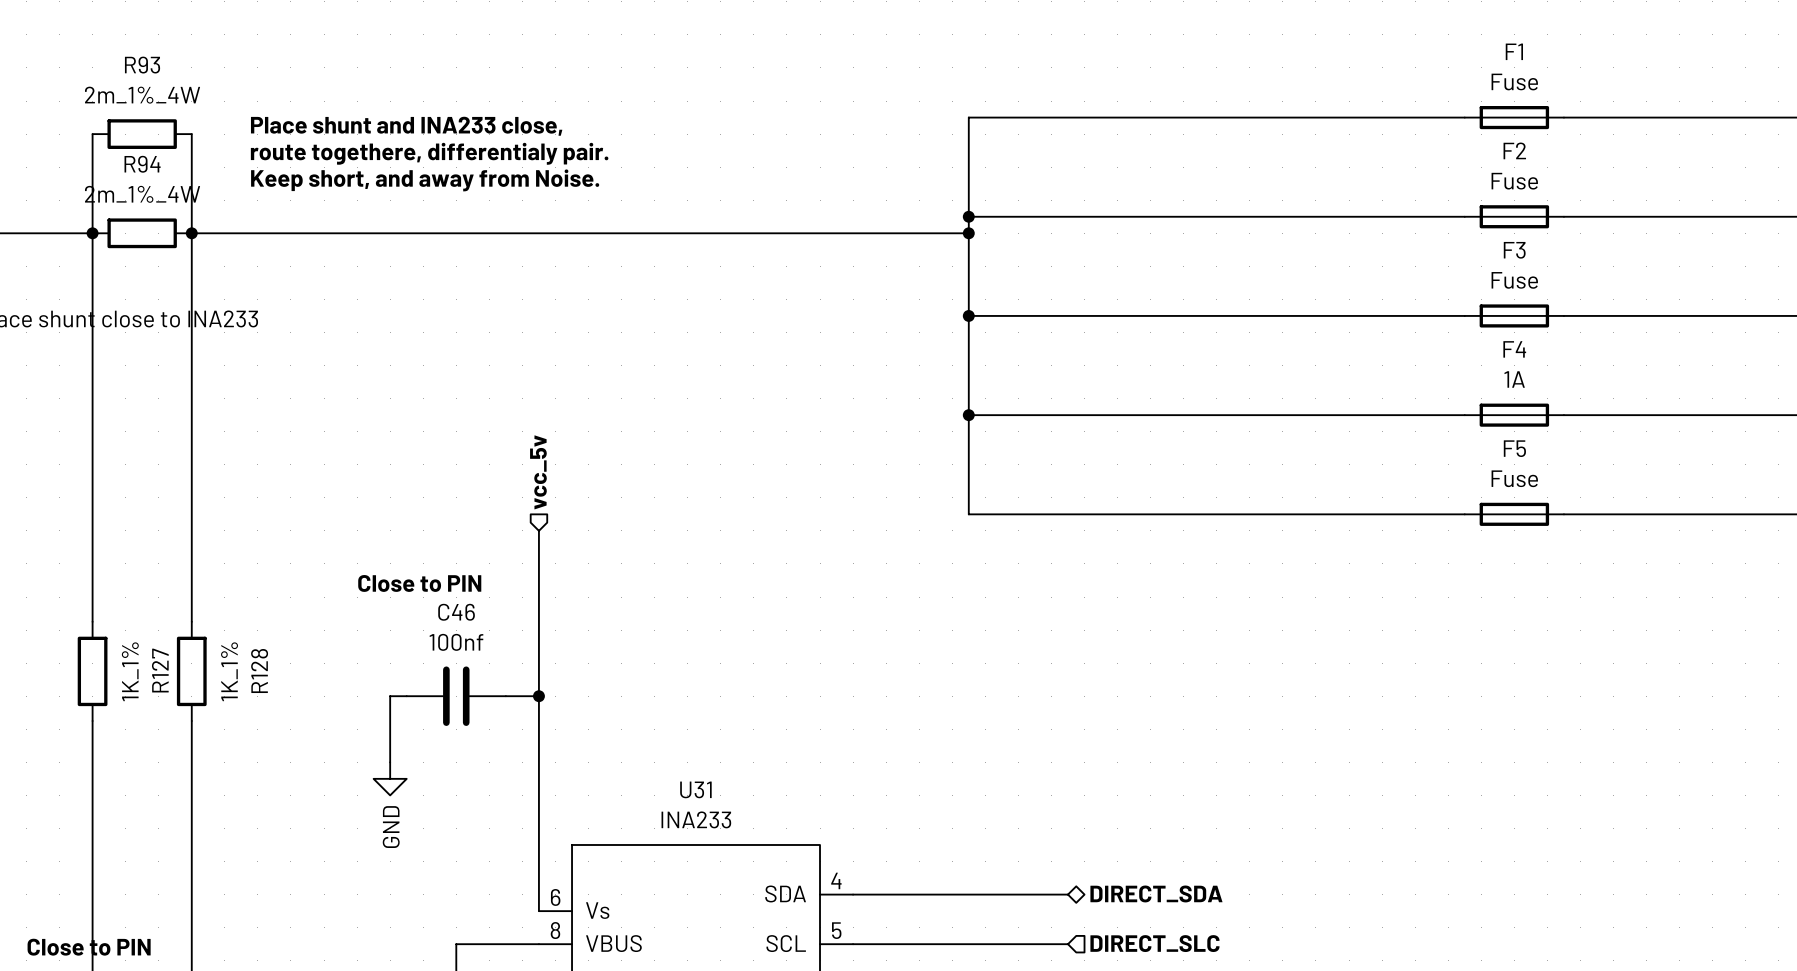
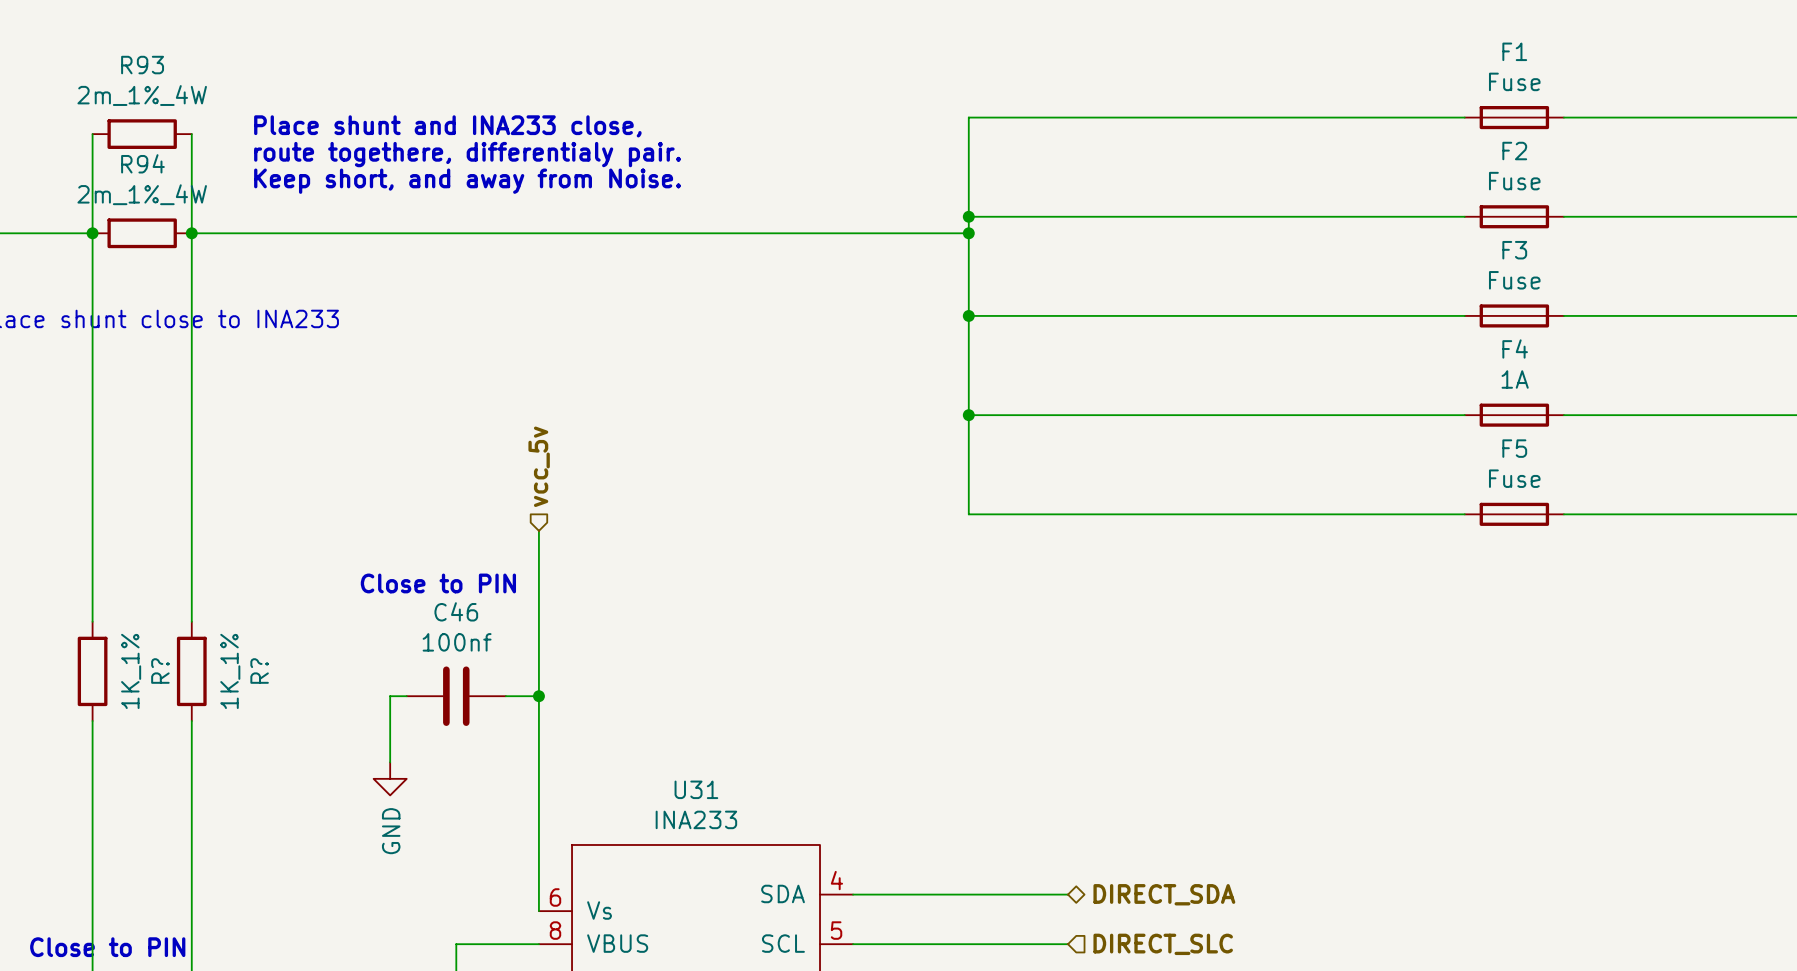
R127 name: R127 (160, 670) -> R? (160, 671)
R128 name: R128 (259, 671) -> R? (259, 671)

